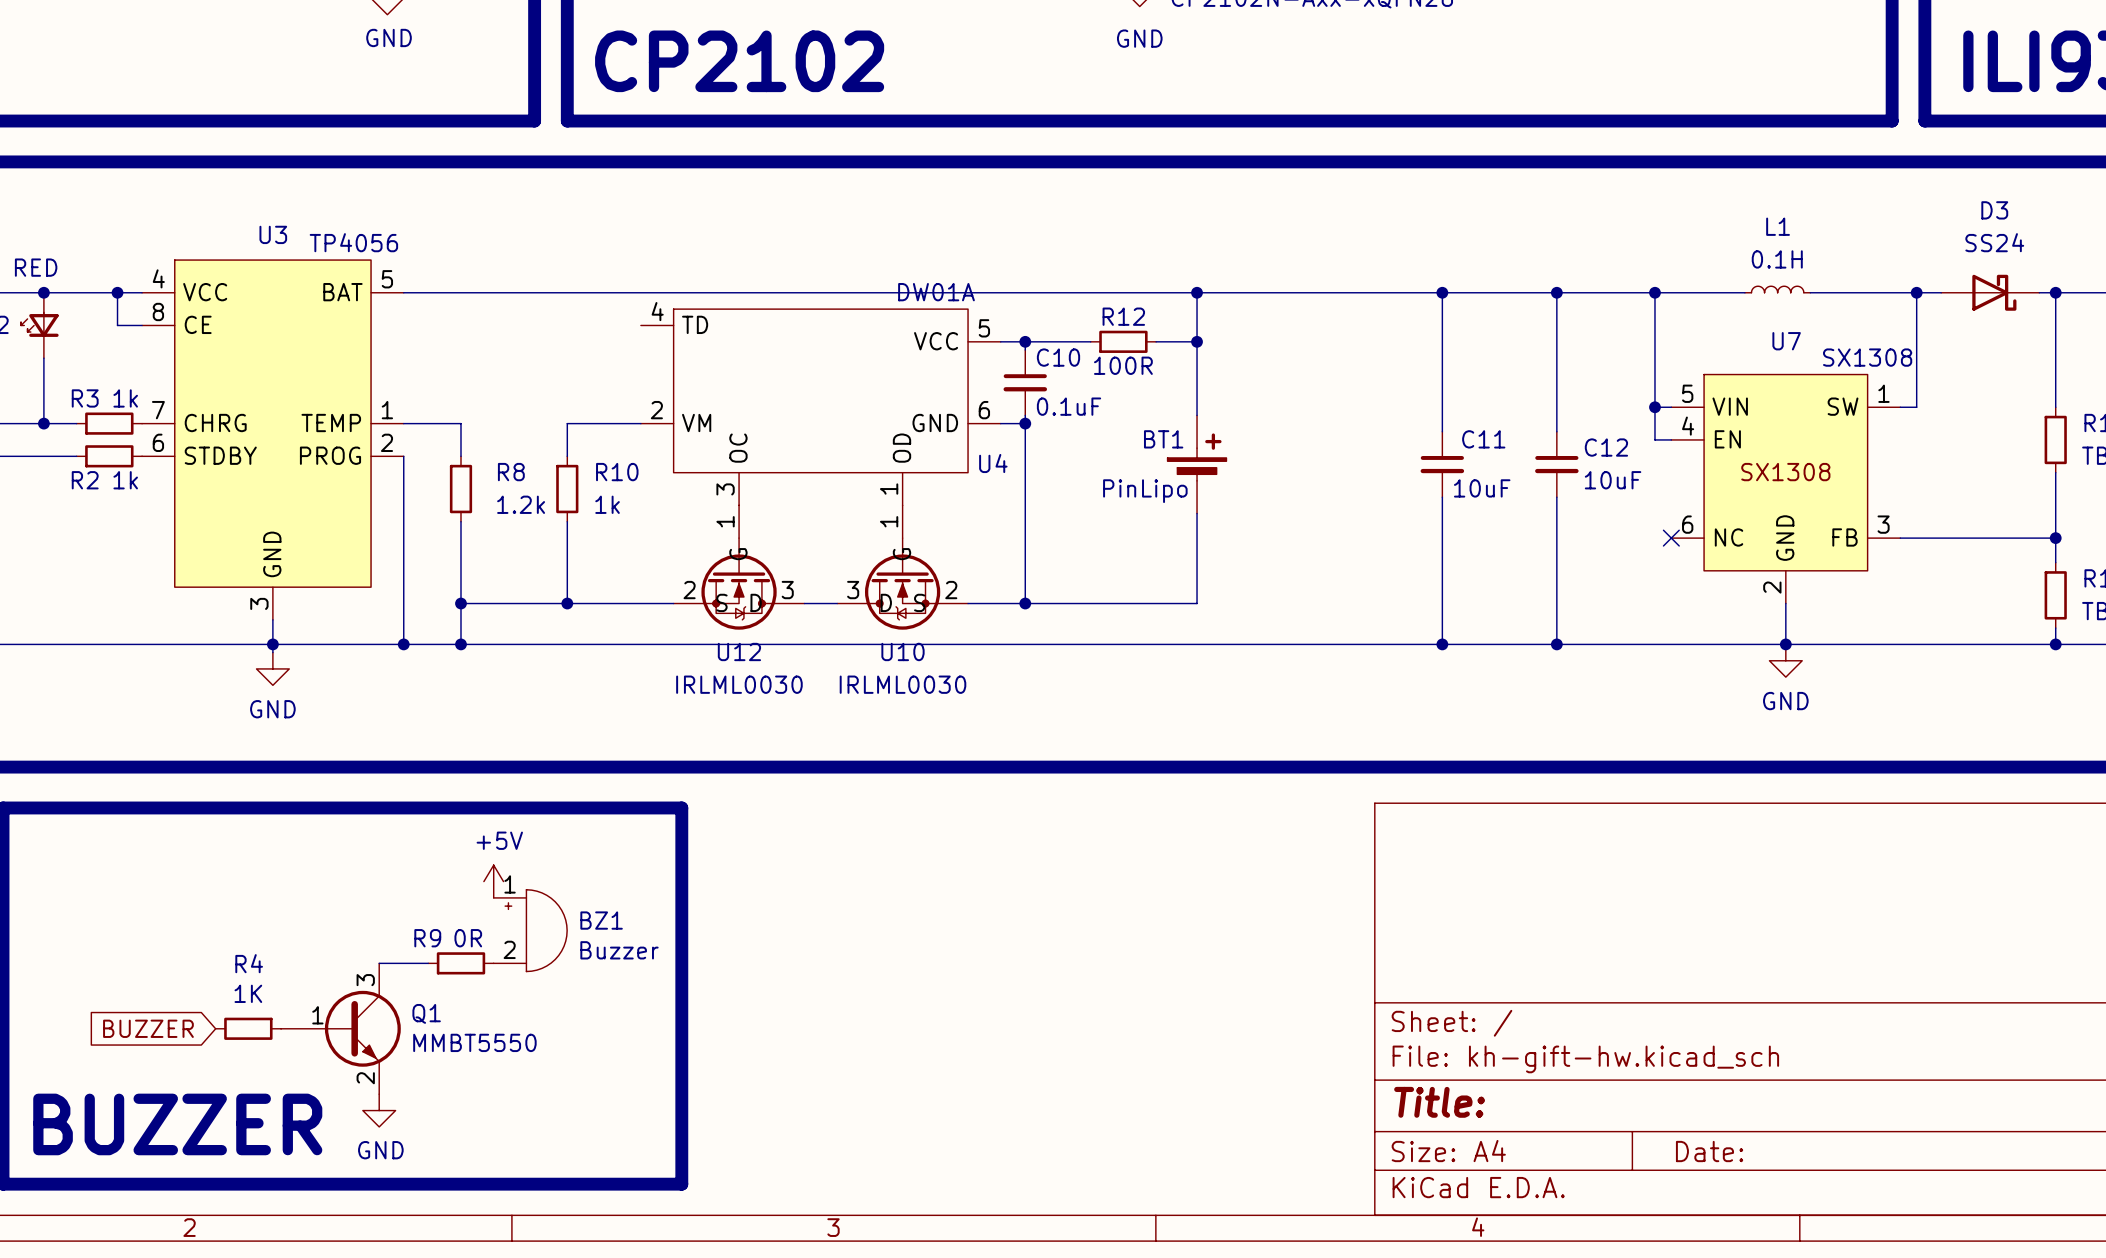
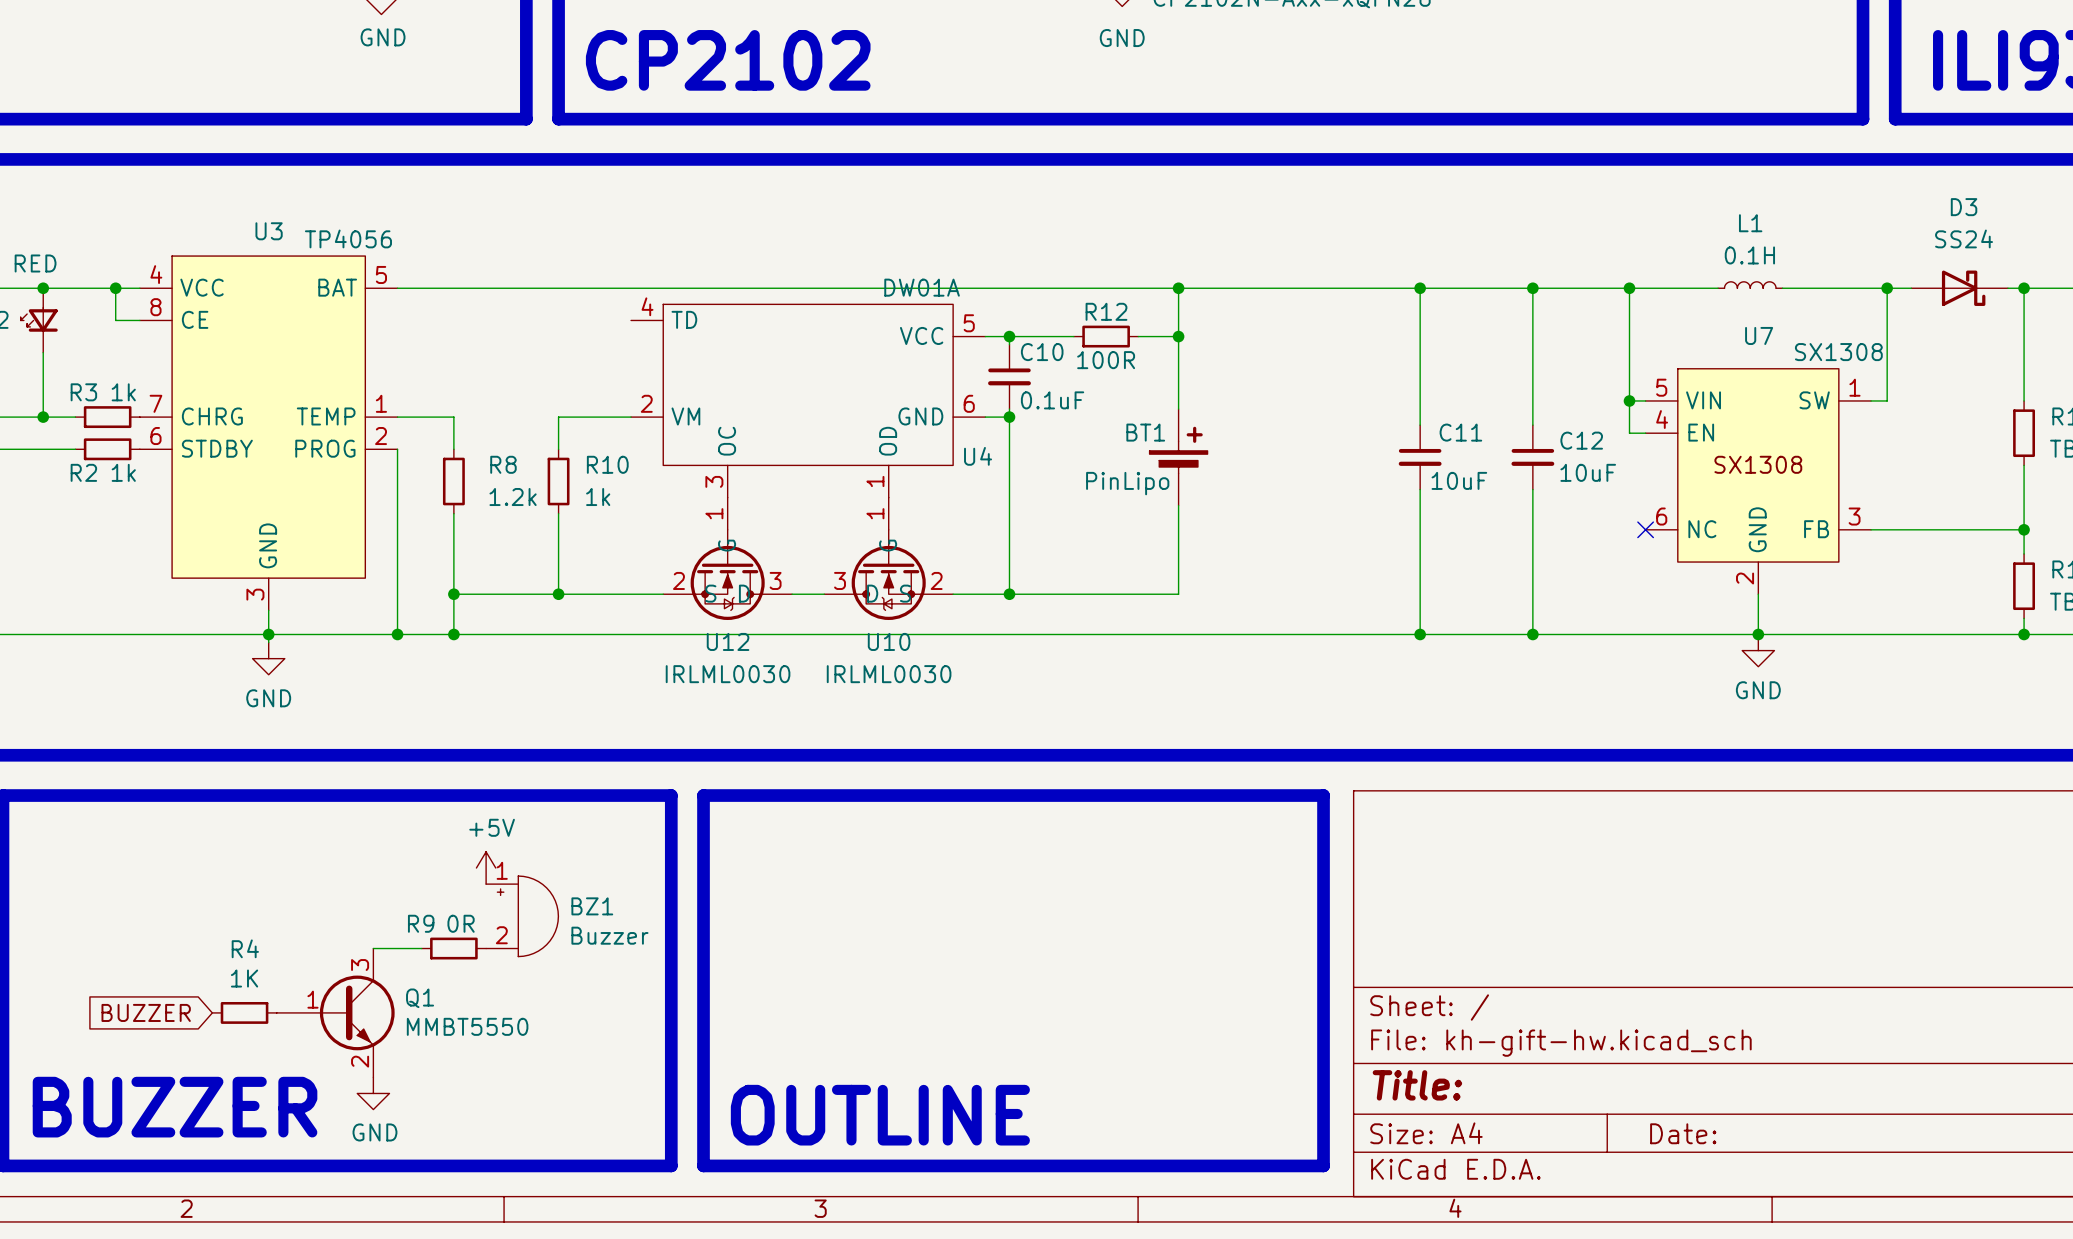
line: none -> (703, 795) (1323, 795) (1323, 1165) (703, 1165) (703, 795)
text: none -> OUTLINE (880, 1115)

